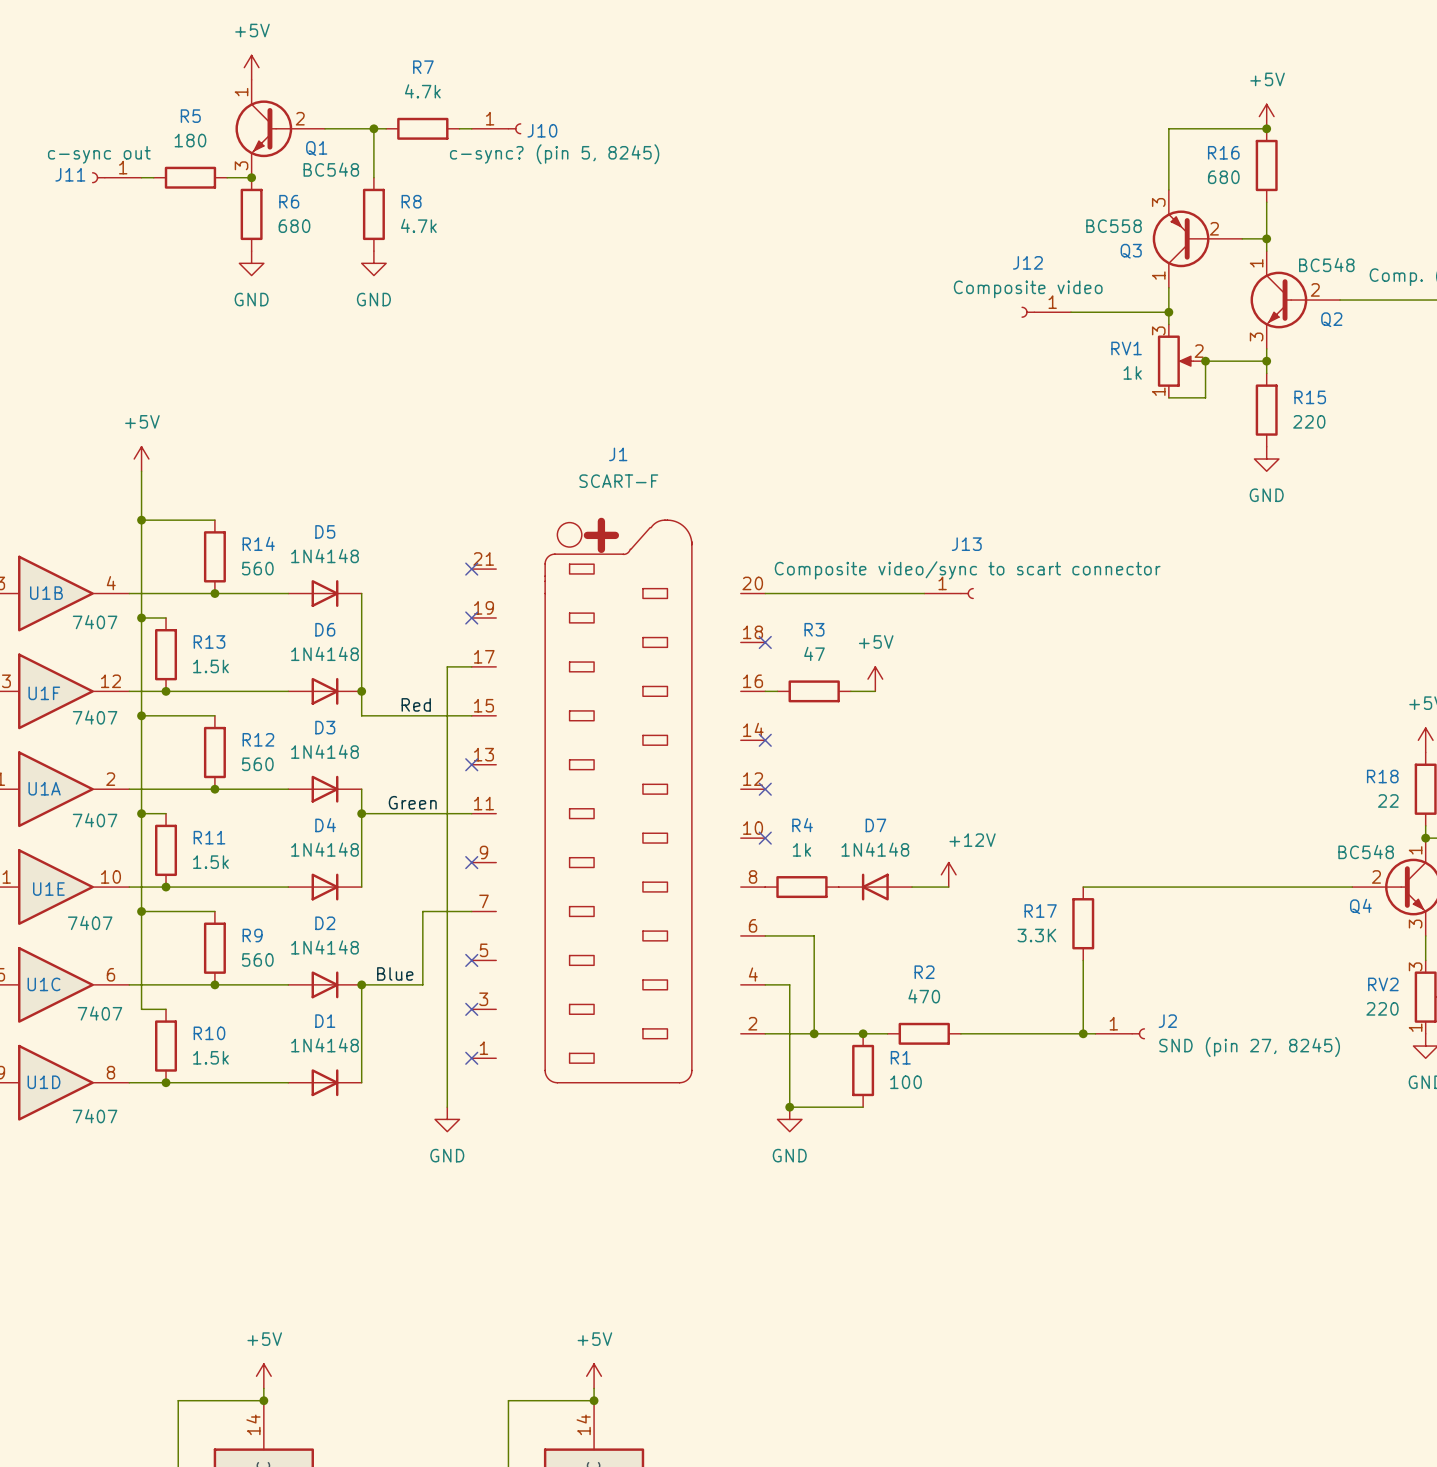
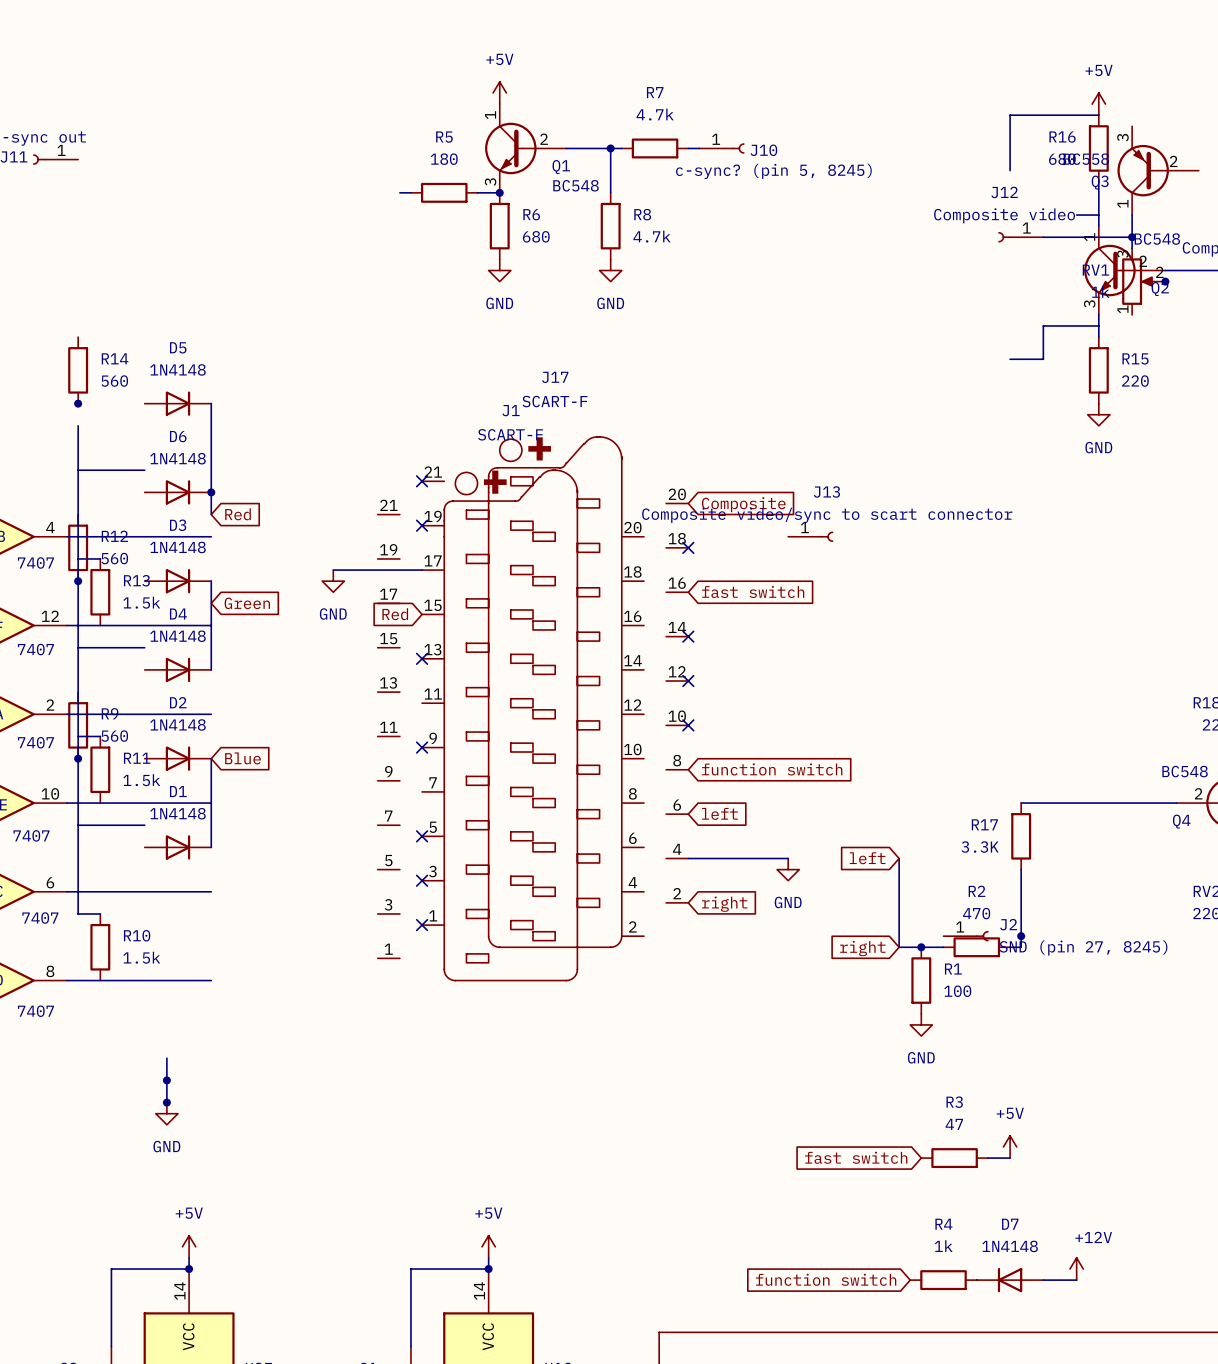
power symbol: +5V (251, 67) -> none
power symbol: none -> +5V (499, 93)
Q1 position: (280, 128) -> (525, 148)
wire: (325, 128) (386, 128) -> none
wire: (373, 128) (373, 177) -> none
junction: (373, 128) -> none
R7 position: (422, 128) -> (655, 148)
wire: (459, 128) (471, 128) -> (399, 192) (410, 192)
J10 position: (496, 128) -> (721, 148)
junction: (1266, 128) -> none
wire: none -> (566, 148) (621, 148)
wire: none -> (610, 148) (610, 192)
junction: none -> (610, 148)
wire: none -> (688, 148) (699, 148)
wire: (141, 177) (153, 177) -> none
R5 position: (190, 177) -> (444, 192)
wire: (227, 177) (251, 177) -> none
junction: (251, 177) -> none
R6 position: (251, 214) -> (499, 226)
R8 position: (373, 214) -> (610, 226)
wire: none -> (477, 192) (499, 192)
junction: none -> (499, 192)
Q3 position: (1197, 238) -> (1158, 170)
junction position: (1266, 238) -> (1132, 237)
power symbol: GND (251, 263) -> none
power symbol: GND (373, 263) -> none
wire: (1168, 287) (1168, 324) -> (1132, 215) (1132, 248)
power symbol: none -> GND (499, 270)
power symbol: none -> GND (610, 270)
J12 position: (1046, 312) -> (1020, 237)
wire: (1071, 312) (1168, 312) -> (1043, 237) (1132, 237)
junction: (1168, 312) -> none
junction: none -> (1165, 281)
RV1 position: (1181, 361) -> (1143, 281)
junction: (1205, 361) -> none
junction: (1266, 361) -> none
junction: none -> (78, 403)
wire: none -> (211, 403) (211, 514)
power symbol: +5V (141, 459) -> none
junction: (141, 520) -> none
no-connect mark: none -> (422, 481)
junction: none -> (211, 492)
R14 position: (214, 556) -> (78, 370)
global label: none -> Composite (743, 504)
global label: none -> Red (238, 514)
no-connect mark: (471, 569) -> none
no-connect mark: none -> (422, 525)
junction: (214, 593) -> none
D5 position: (325, 593) -> (177, 403)
wire: (361, 593) (361, 715) (471, 715) -> none
wire: (765, 593) (924, 593) -> none
no-connect mark: none -> (688, 547)
junction position: (141, 617) -> (78, 581)
no-connect mark: (471, 617) -> none
wire: none -> (333, 570) (422, 570)
power symbol: none -> GND (333, 581)
no-connect mark: (765, 642) -> none
global label: none -> fast switch (753, 591)
global label: none -> Green (247, 603)
wire: (471, 666) (447, 666) (447, 1107) -> none
global label: none -> Red (395, 614)
power symbol: +5V (875, 679) -> none
junction: (166, 691) -> none
D6 position: (325, 691) -> (177, 492)
junction: (361, 691) -> none
wire: (765, 691) (777, 691) -> none
R3 position: (814, 691) -> (954, 1158)
wire: (850, 691) (875, 691) -> none
no-connect mark: none -> (688, 636)
label: Red (416, 704) -> none
junction: (141, 715) -> none
no-connect mark: none -> (422, 658)
no-connect mark: (765, 740) -> none
R12 position: (214, 752) -> (78, 547)
no-connect mark: none -> (688, 681)
no-connect mark: (471, 764) -> none
J17: none -> SCART-F (555, 692)
junction: (214, 789) -> none
D3 position: (325, 789) -> (177, 581)
wire: (361, 789) (361, 887) -> (211, 581) (211, 669)
no-connect mark: (765, 789) -> none
no-connect mark: none -> (688, 725)
label: Green (412, 802) -> none
junction position: (141, 813) -> (78, 758)
wire: (361, 813) (471, 813) -> none
junction: (361, 813) -> none
no-connect mark: none -> (422, 747)
wire: none -> (211, 758) (211, 847)
global label: none -> Blue (242, 758)
no-connect mark: (765, 838) -> none
global label: none -> function switch (772, 769)
no-connect mark: (471, 862) -> none
power symbol: +12V (948, 874) -> none
junction: (166, 887) -> none
D4 position: (325, 887) -> (177, 669)
R4 position: (801, 887) -> (943, 1280)
D7 position: (875, 887) -> (1010, 1280)
wire: (912, 887) (948, 887) -> none
wire: (1083, 887) (1181, 887) -> none
global label: none -> left (719, 813)
junction: (141, 911) -> none
wire: (471, 911) (422, 911) (422, 984) (361, 984) (361, 1082) -> none
no-connect mark: none -> (422, 836)
R17 position: (1083, 923) -> (1021, 836)
wire: (765, 935) (814, 935) (814, 1033) -> none
R9 position: (214, 948) -> (78, 725)
wire: none -> (688, 858) (788, 858)
global label: none -> left (867, 858)
wire: none -> (899, 858) (899, 947) (943, 947)
no-connect mark: (471, 960) -> none
power symbol: none -> GND (788, 869)
wire: (1083, 960) (1083, 1033) -> none
wire: none -> (1021, 869) (1021, 947) (1010, 947)
no-connect mark: none -> (422, 880)
label: Blue (395, 973) -> none
junction: (214, 984) -> none
D2 position: (325, 984) -> (177, 758)
junction: (361, 984) -> none
wire: (765, 984) (789, 984) (789, 1107) (863, 1107) -> none
global label: none -> right (724, 904)
no-connect mark: (471, 1009) -> none
no-connect mark: none -> (422, 925)
wire: (765, 1033) (887, 1033) -> none
junction: (814, 1033) -> none
junction: (863, 1033) -> none
R2 position: (924, 1033) -> (976, 947)
wire: (960, 1033) (1095, 1033) -> none
junction position: (1083, 1033) -> (921, 947)
junction: none -> (1021, 936)
global label: none -> right (862, 948)
no-connect mark: (471, 1058) -> none
R1 position: (863, 1070) -> (921, 980)
junction: (166, 1082) -> none
D1 position: (325, 1082) -> (177, 847)
junction: (789, 1107) -> none
power symbol position: GND (447, 1119) -> GND (166, 1113)
power symbol: GND (789, 1119) -> none
power symbol: none -> GND (921, 1024)
wire: none -> (166, 1058) (166, 1102)
junction: none -> (166, 1080)
junction: none -> (166, 1102)
power symbol: none -> +5V (1010, 1146)
global label: none -> fast switch (856, 1157)
wire: none -> (987, 1158) (1010, 1158)
power symbol: none -> +12V (1076, 1269)
global label: none -> function switch (826, 1279)
wire: none -> (1043, 1280) (1076, 1280)

